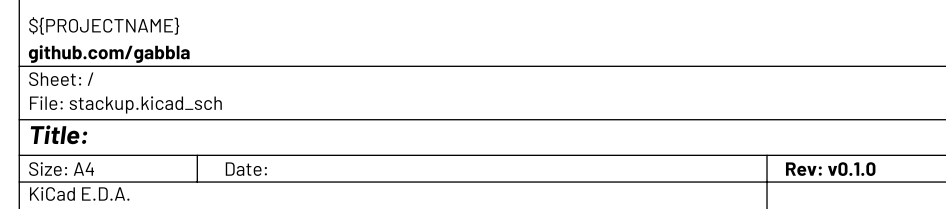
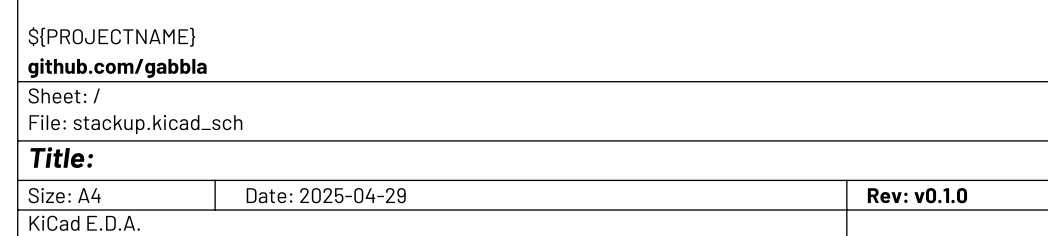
title block: Date: (246, 169) -> Date: 2025-04-29 (326, 195)

